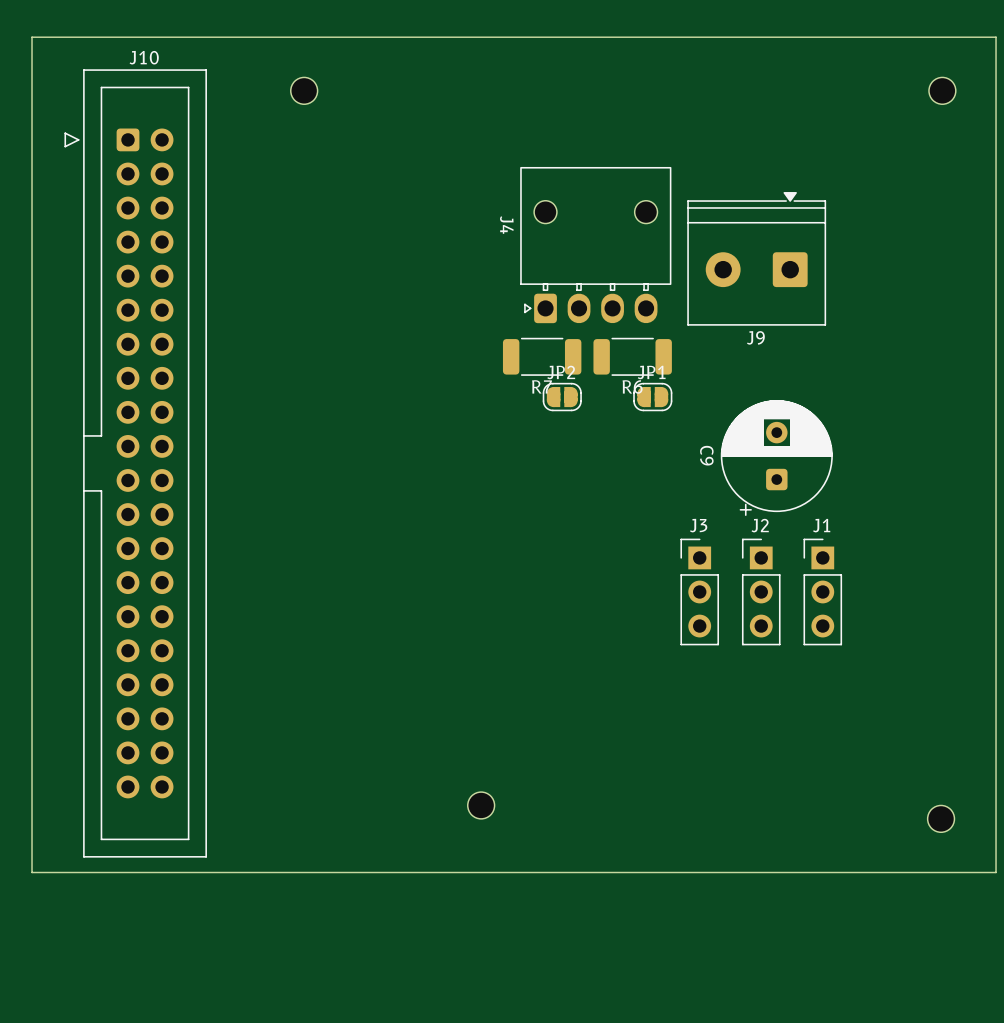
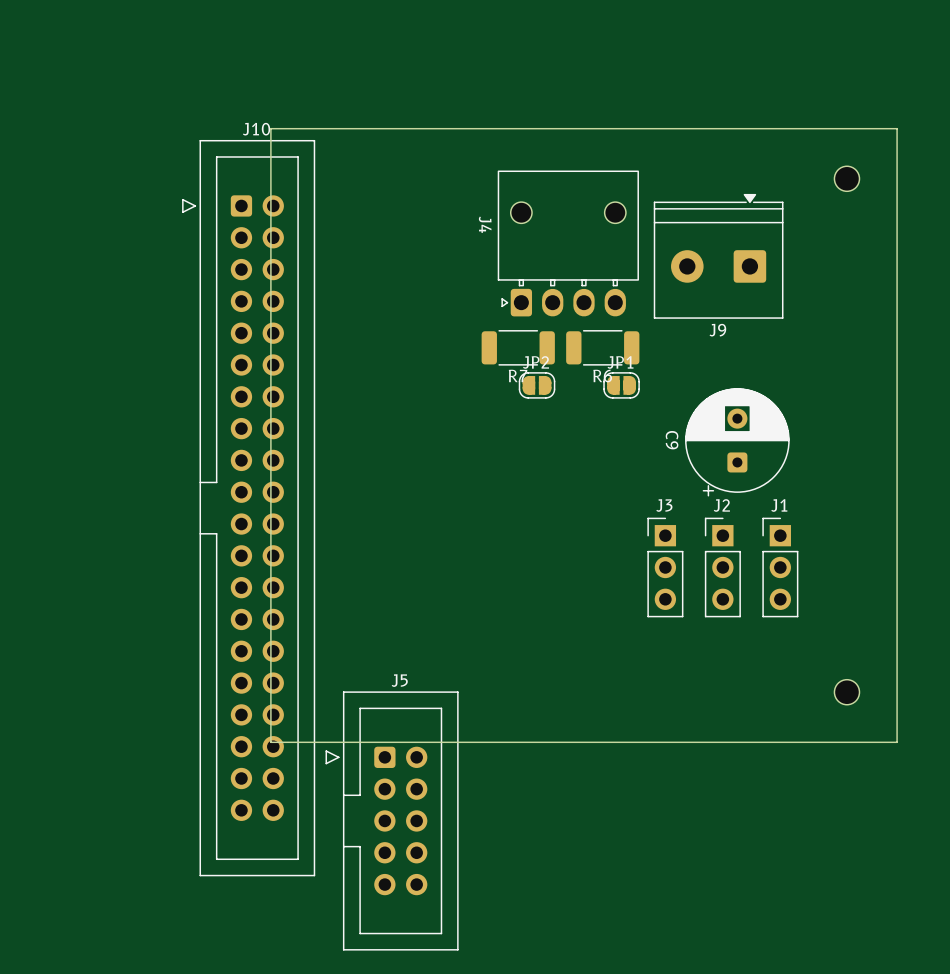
board edge: (996, 37) (32, 37) (32, 872) (996, 872) (996, 37) -> (897, 128) (897, 742) (270, 742) (270, 128) (897, 128)
part: (304, 90) -> none
part position: (942, 90) -> (846, 178)
J10 position: (135, 463) -> (248, 508)
part: (481, 805) -> none
part position: (941, 818) -> (846, 692)
J5: none -> (392, 820)

